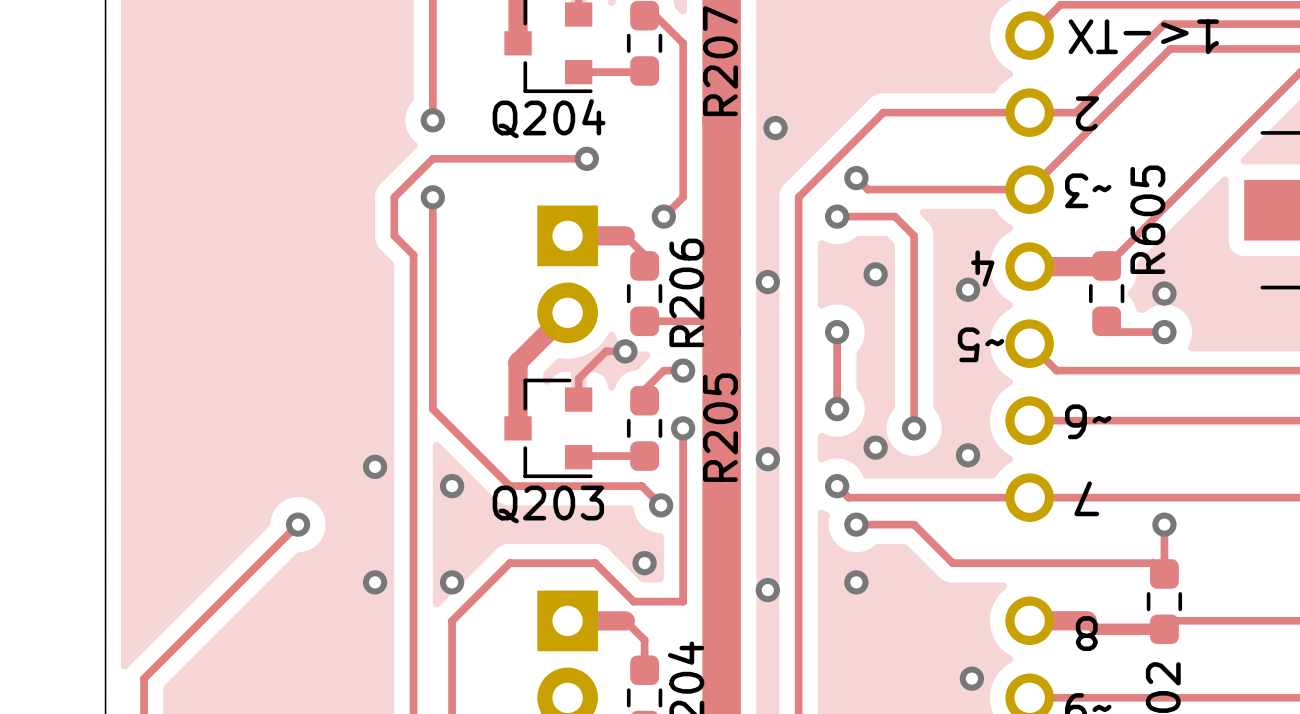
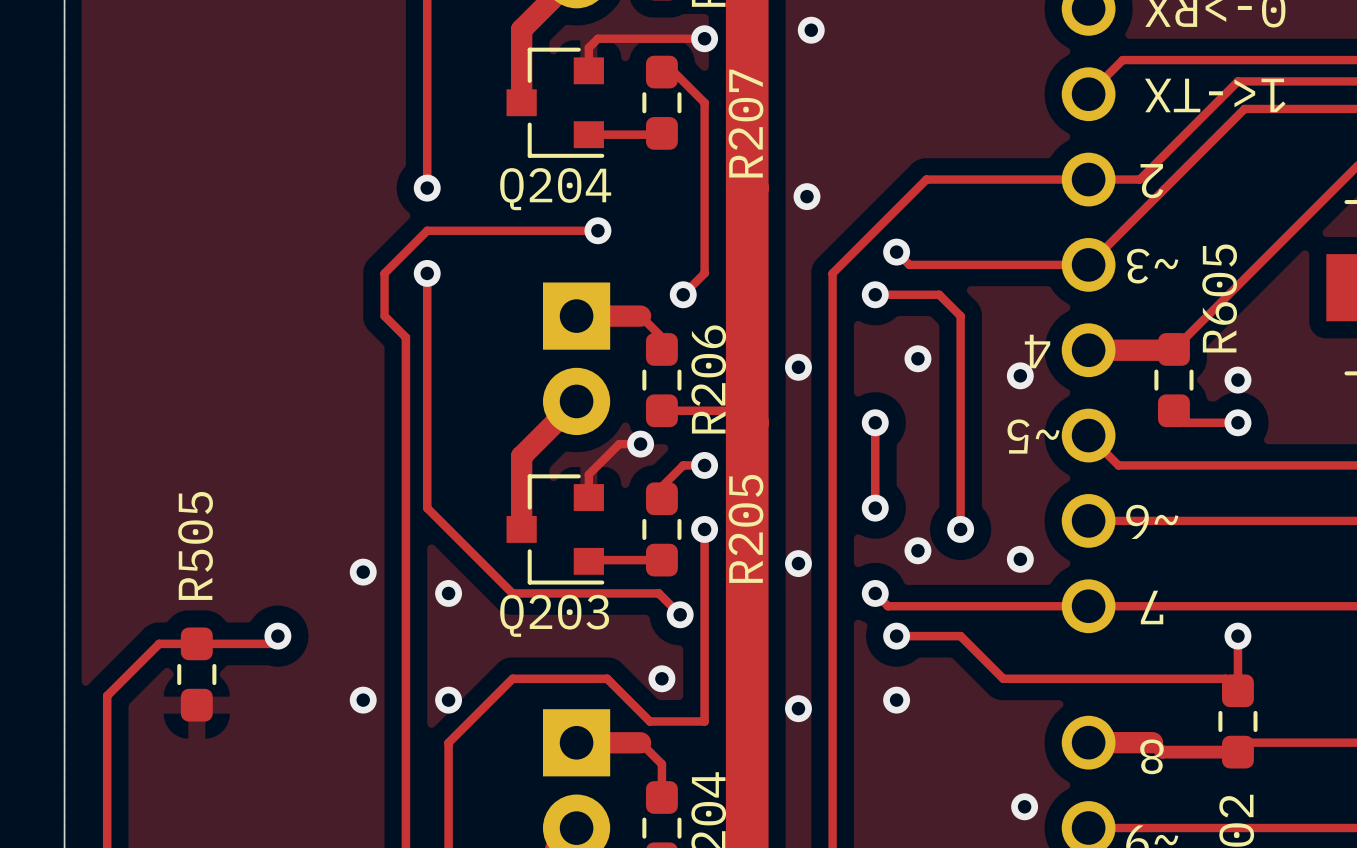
track: (291, 531) (144, 678) -> (270, 643) (159, 643) (107, 695) (107, 806)
R505: none -> (196, 674)

